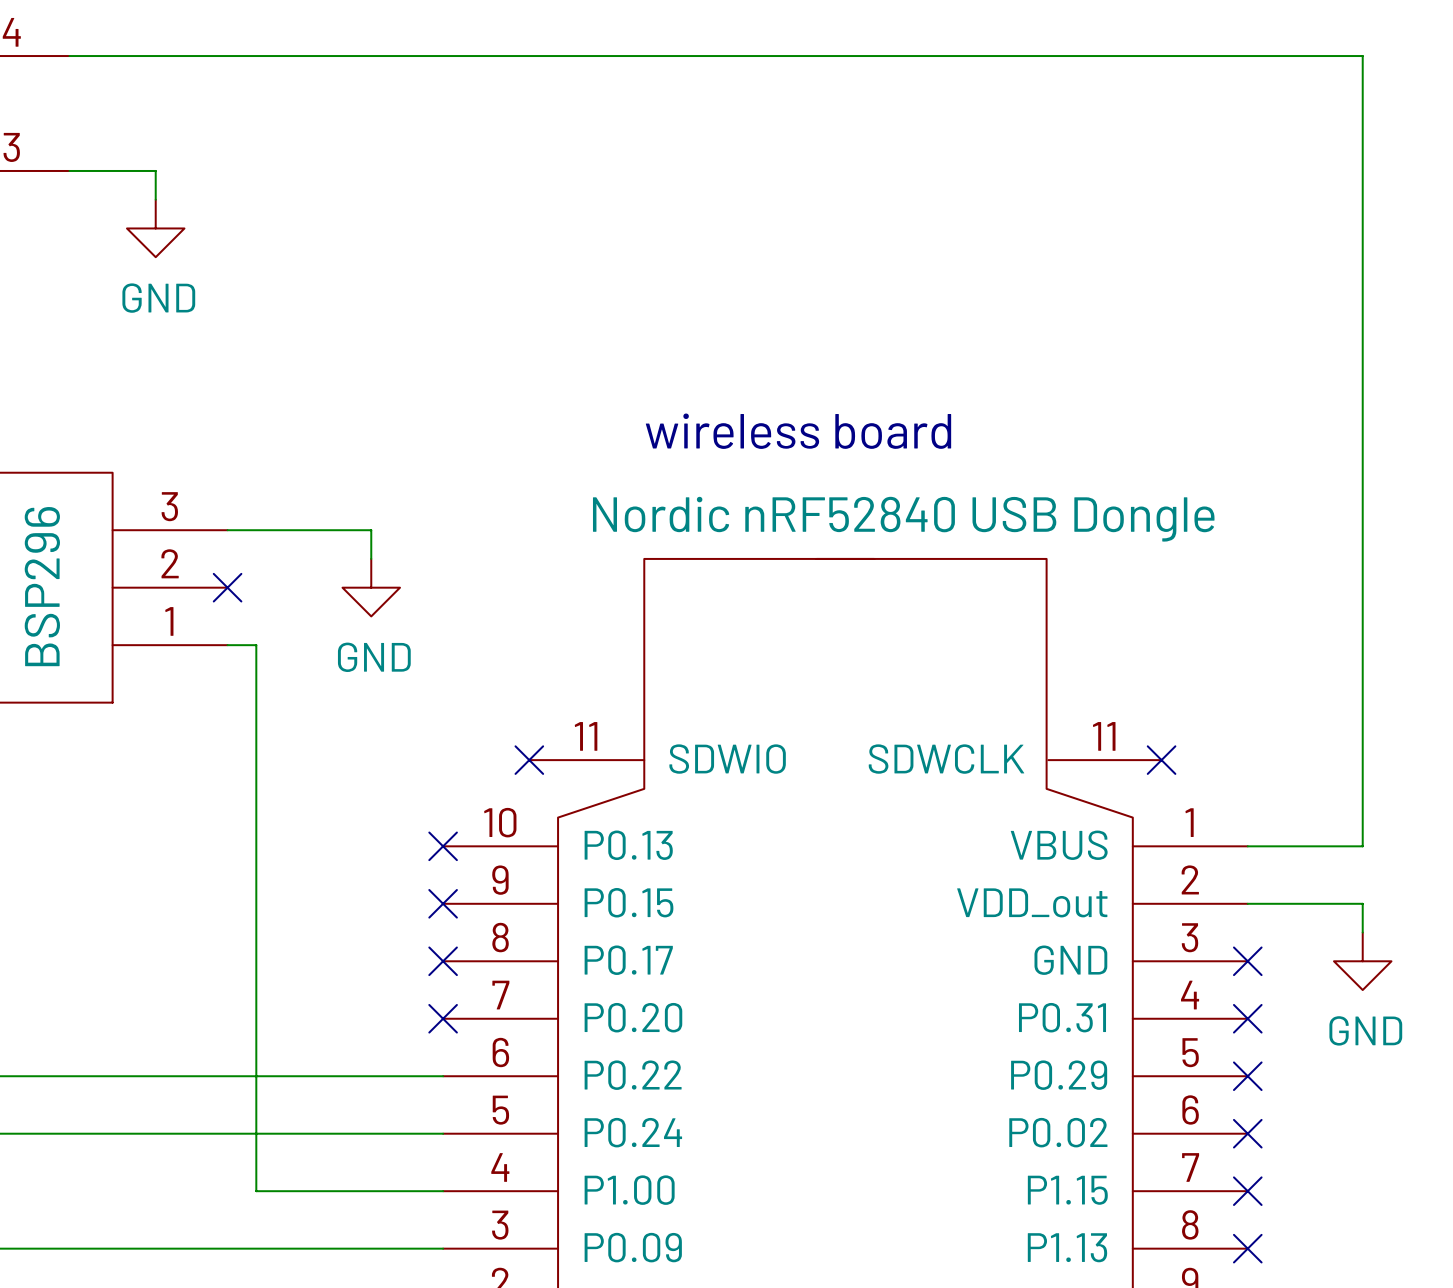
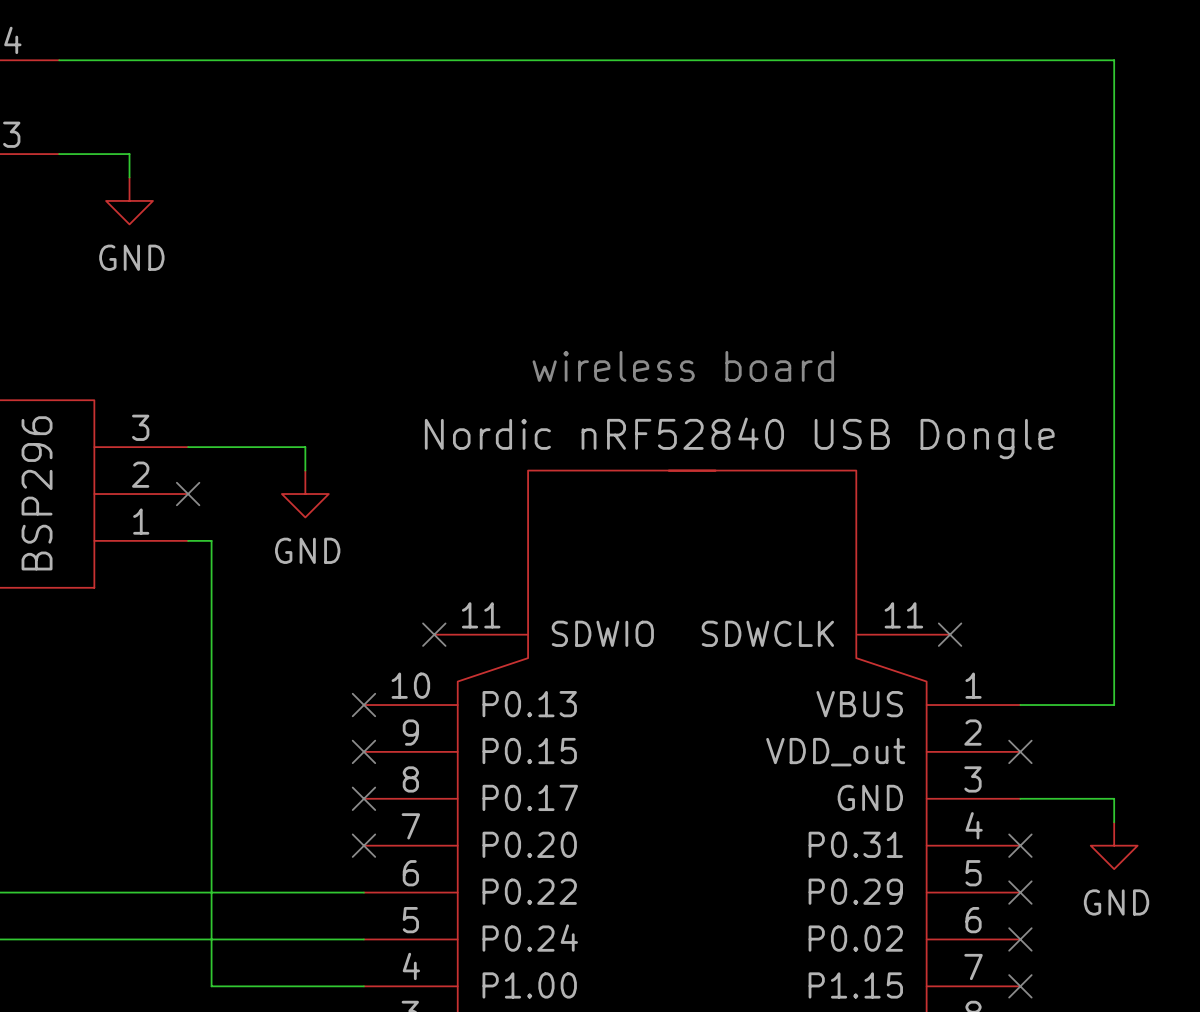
wire: (1247, 903) (1362, 903) (1362, 932) -> (1020, 798) (1114, 798) (1114, 822)
no-connect mark position: (1247, 961) -> (1020, 751)
power symbol position: GND (1362, 961) -> GND (1114, 845)

